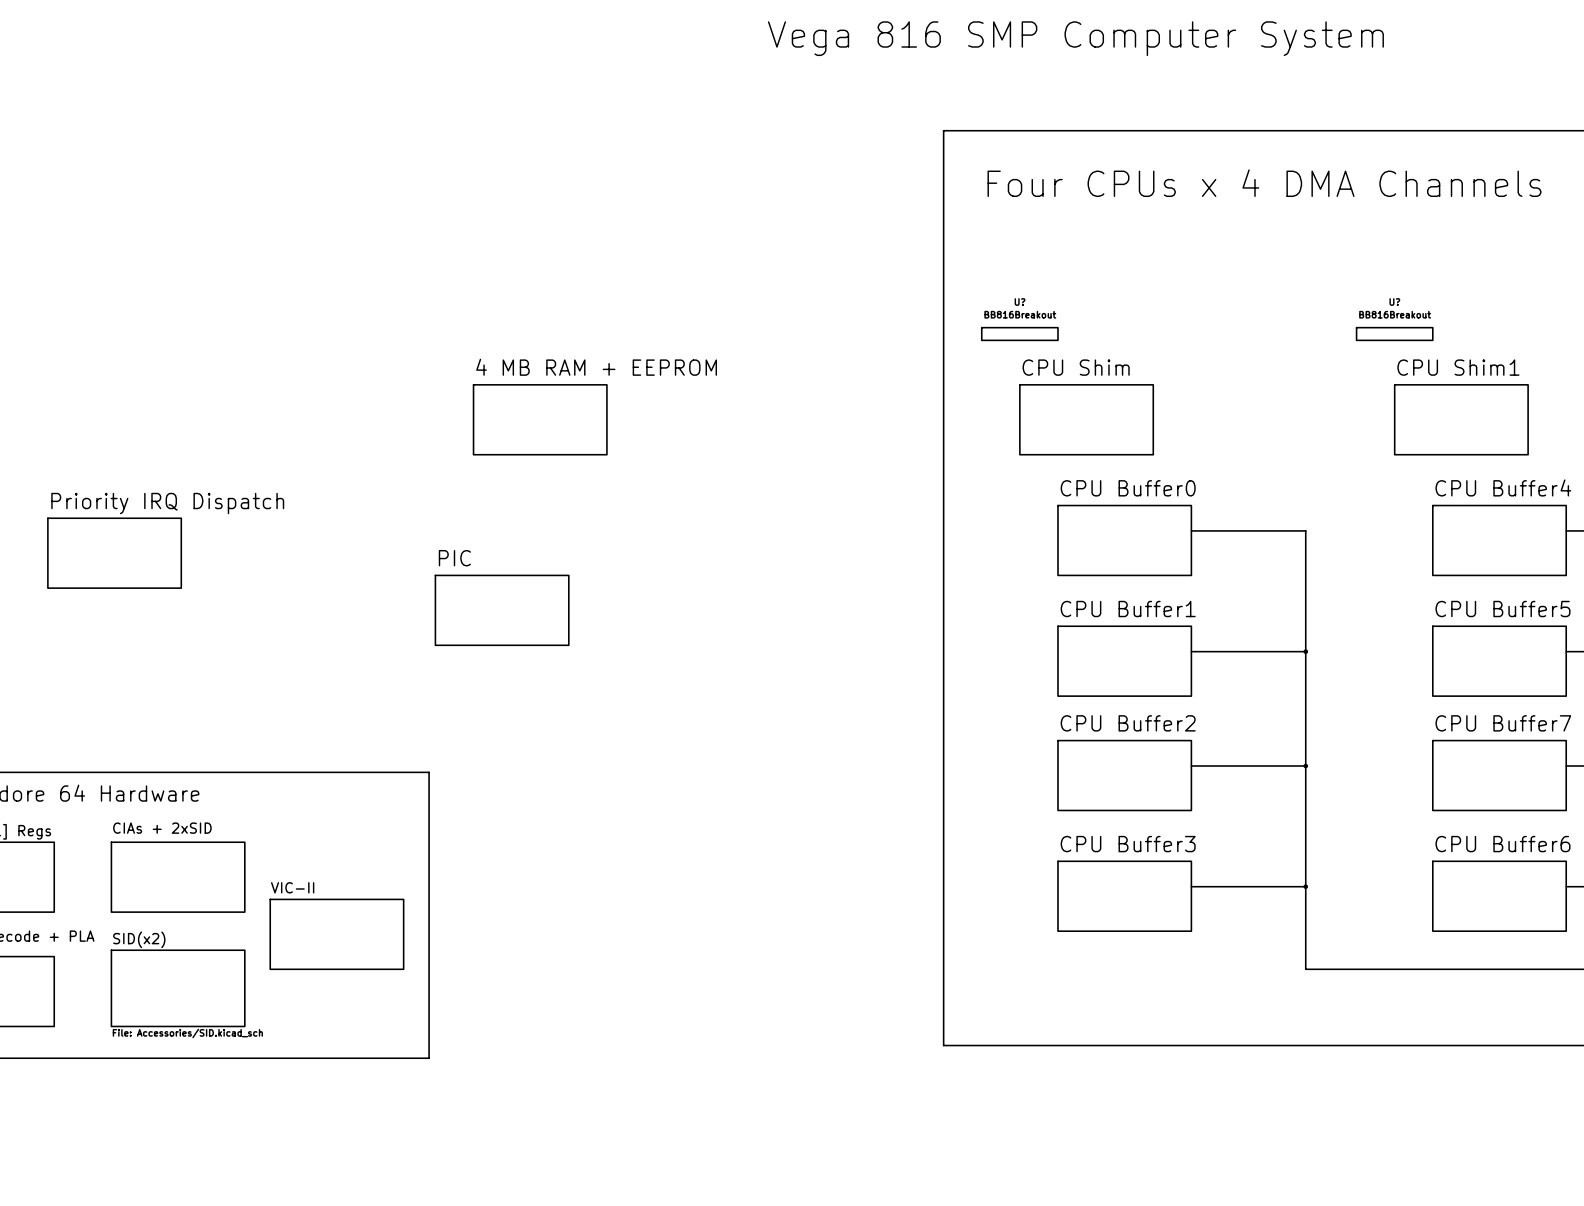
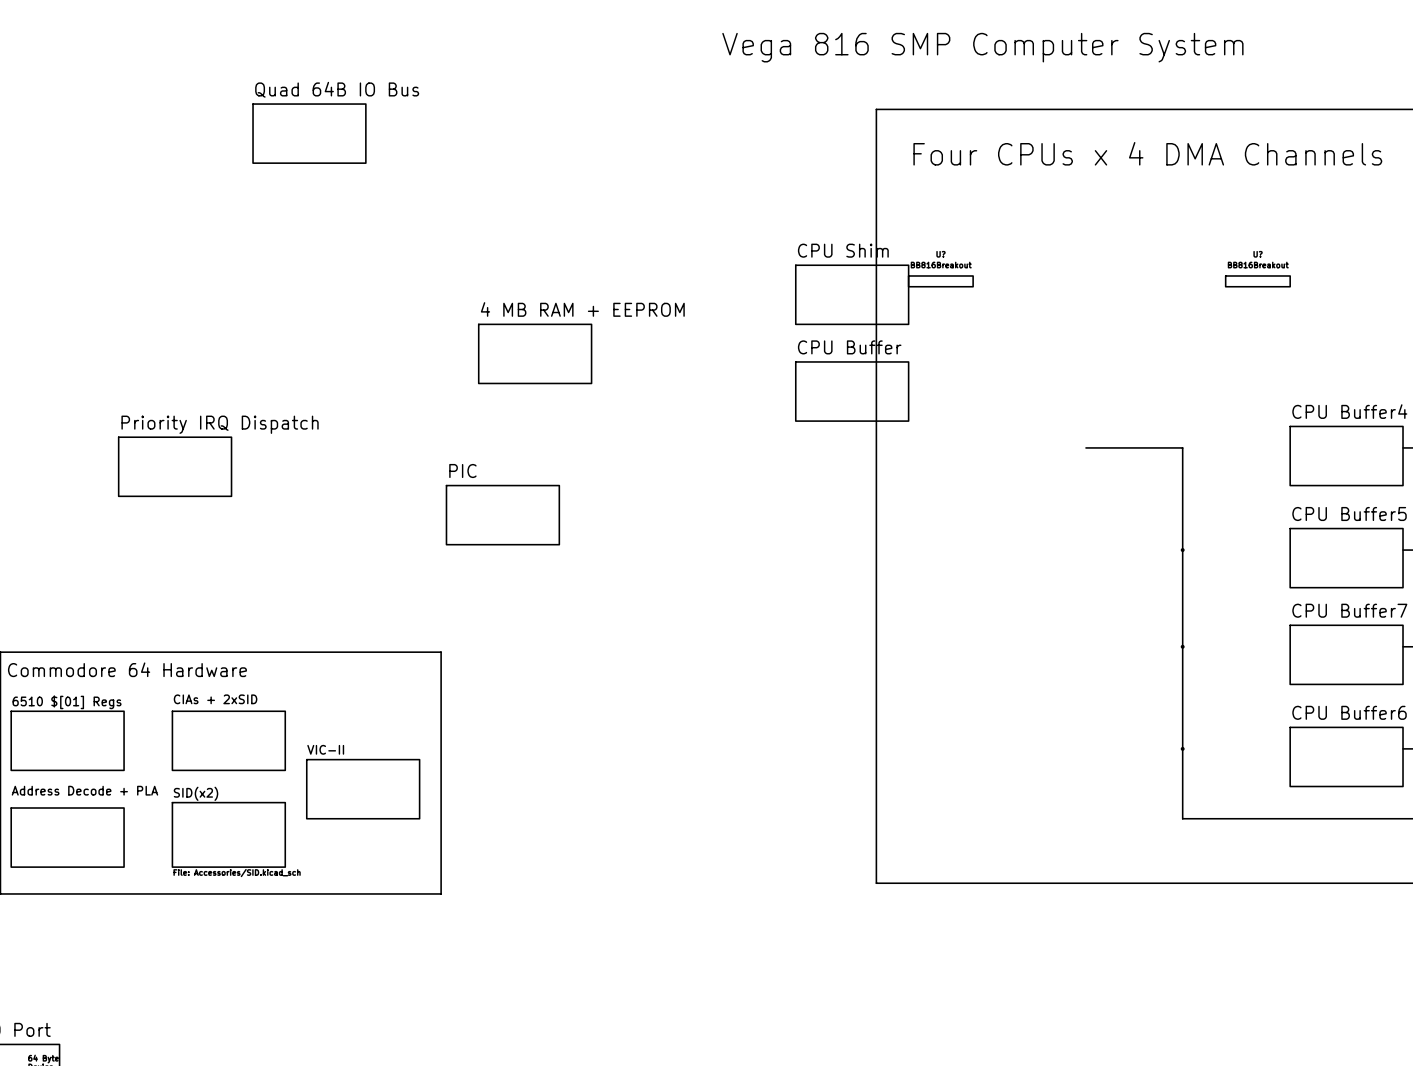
text position: Vega 816 SMP Computer System (1075, 38) -> Vega 816 SMP Computer System (982, 47)
sheet Quad 64B IO Bus: none -> (309, 133)
sheet CPU Shim: none -> (852, 294)
sheet CPU Shim: (1086, 419) -> none
sheet CPU Shim1: (1461, 419) -> none
sheet CPU Buffer: none -> (852, 391)
sheet CPU Buffer0: (1124, 540) -> none
bus: (1191, 651) (1305, 651) -> none
sheet CPU Buffer1: (1124, 661) -> none
bus: (1191, 766) (1305, 766) -> none
sheet CPU Buffer2: (1124, 775) -> none
bus: (1191, 886) (1305, 886) -> none
sheet CPU Buffer3: (1124, 896) -> none

